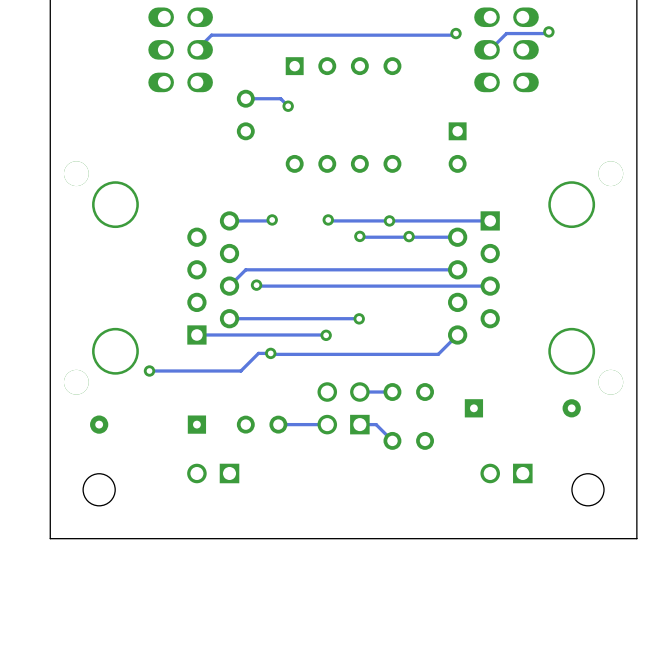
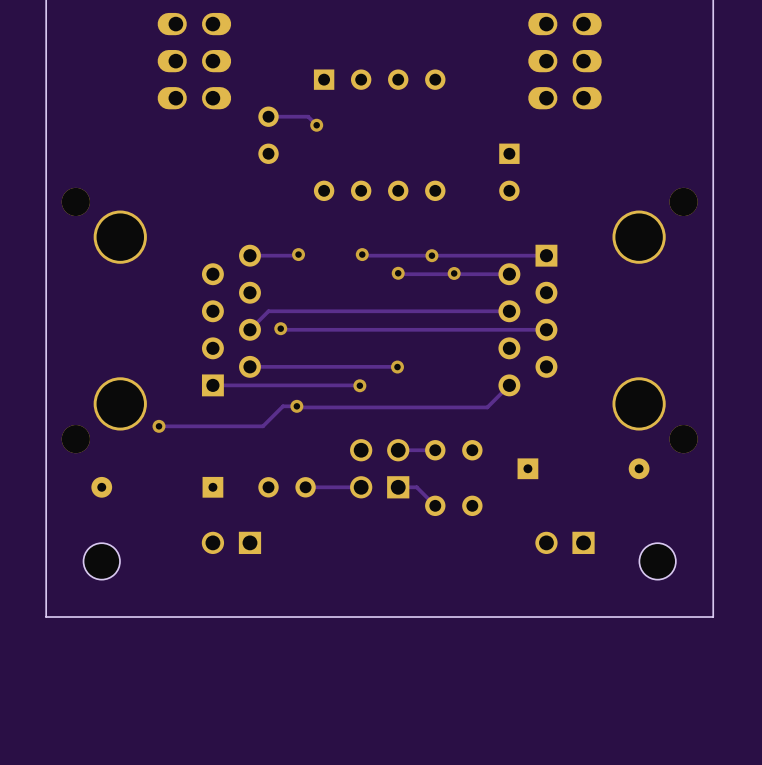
track: (548, 31) (547, 33) (506, 33) (490, 49) -> none
via: (548, 31) -> none
track: (456, 33) (454, 35) (211, 35) (196, 49) -> none
via: (456, 33) -> none

